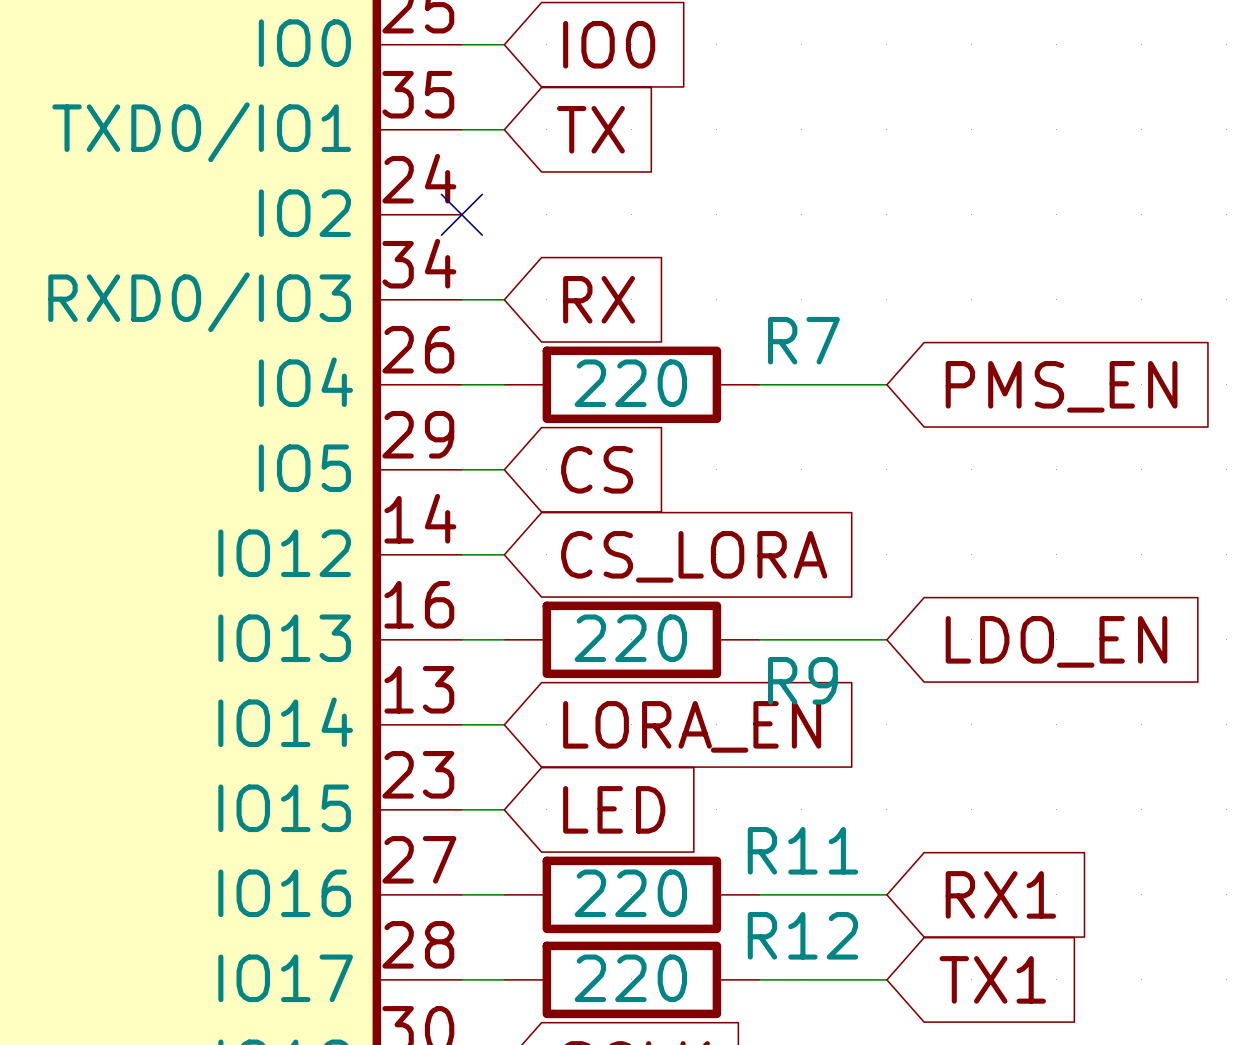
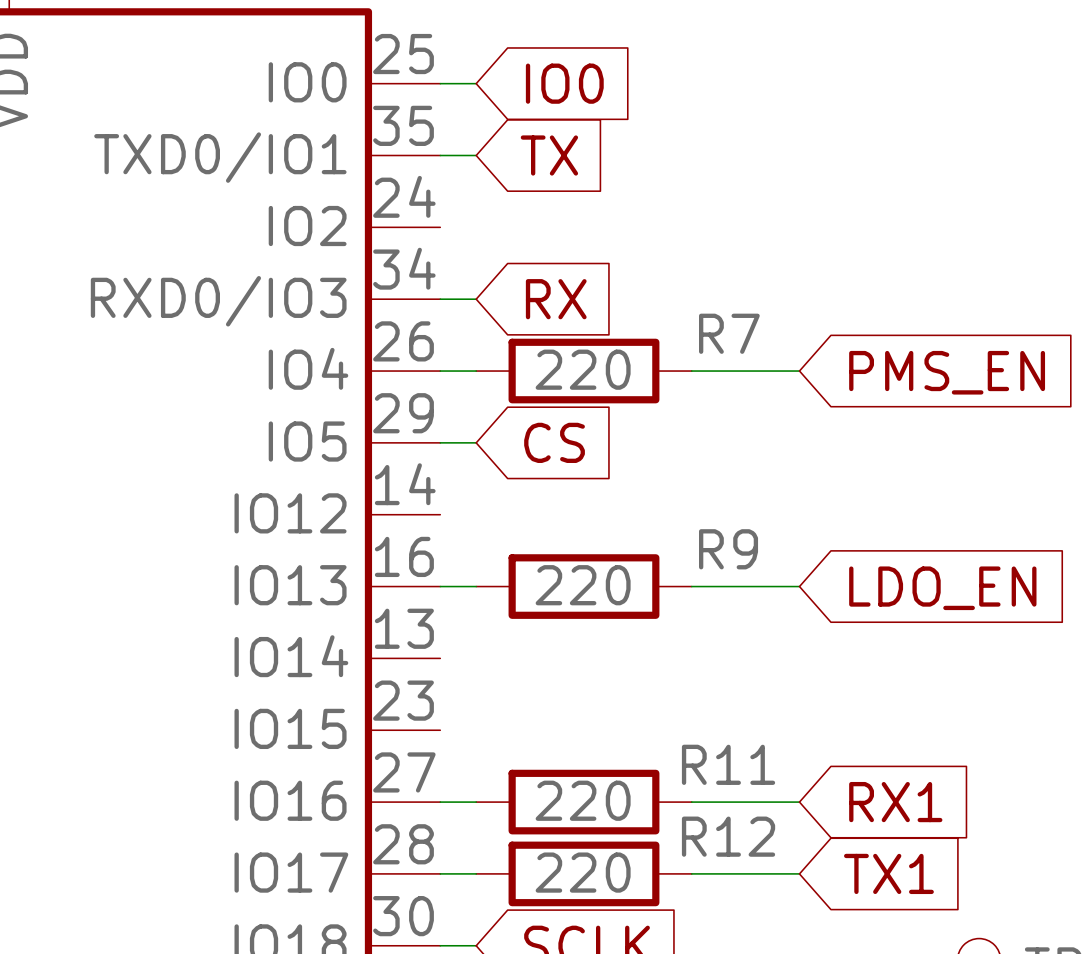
no-connect mark: (461, 214) -> none
wire: (461, 554) (504, 554) -> none
global label: CS_LORA (694, 556) -> none
R9 name position: R9 (802, 680) -> R9 (728, 549)
wire: (461, 724) (504, 724) -> none
global label: LORA_EN (692, 726) -> none
wire: (461, 809) (504, 809) -> none
global label: LED (614, 809) -> none

